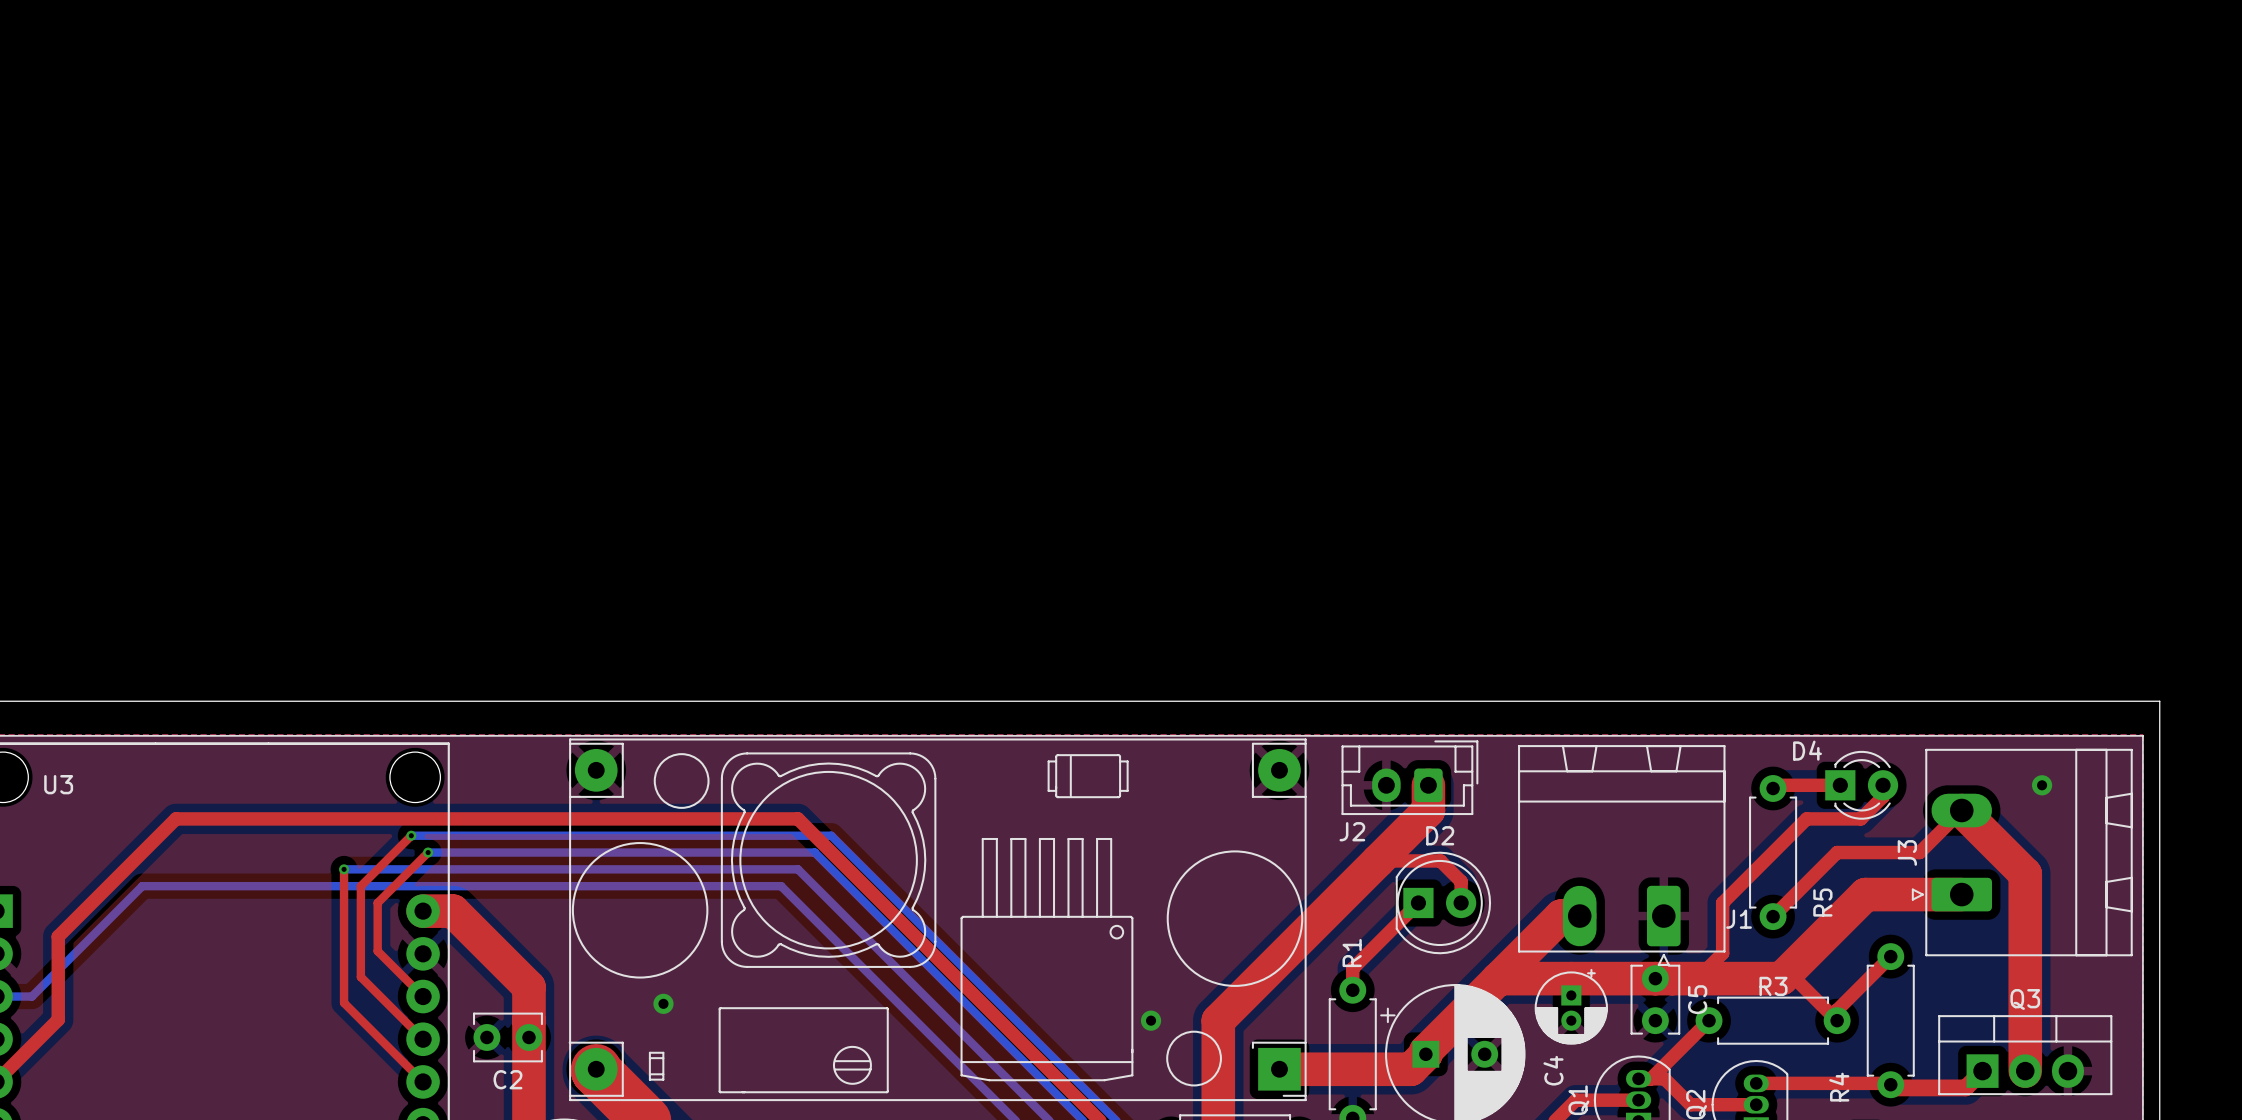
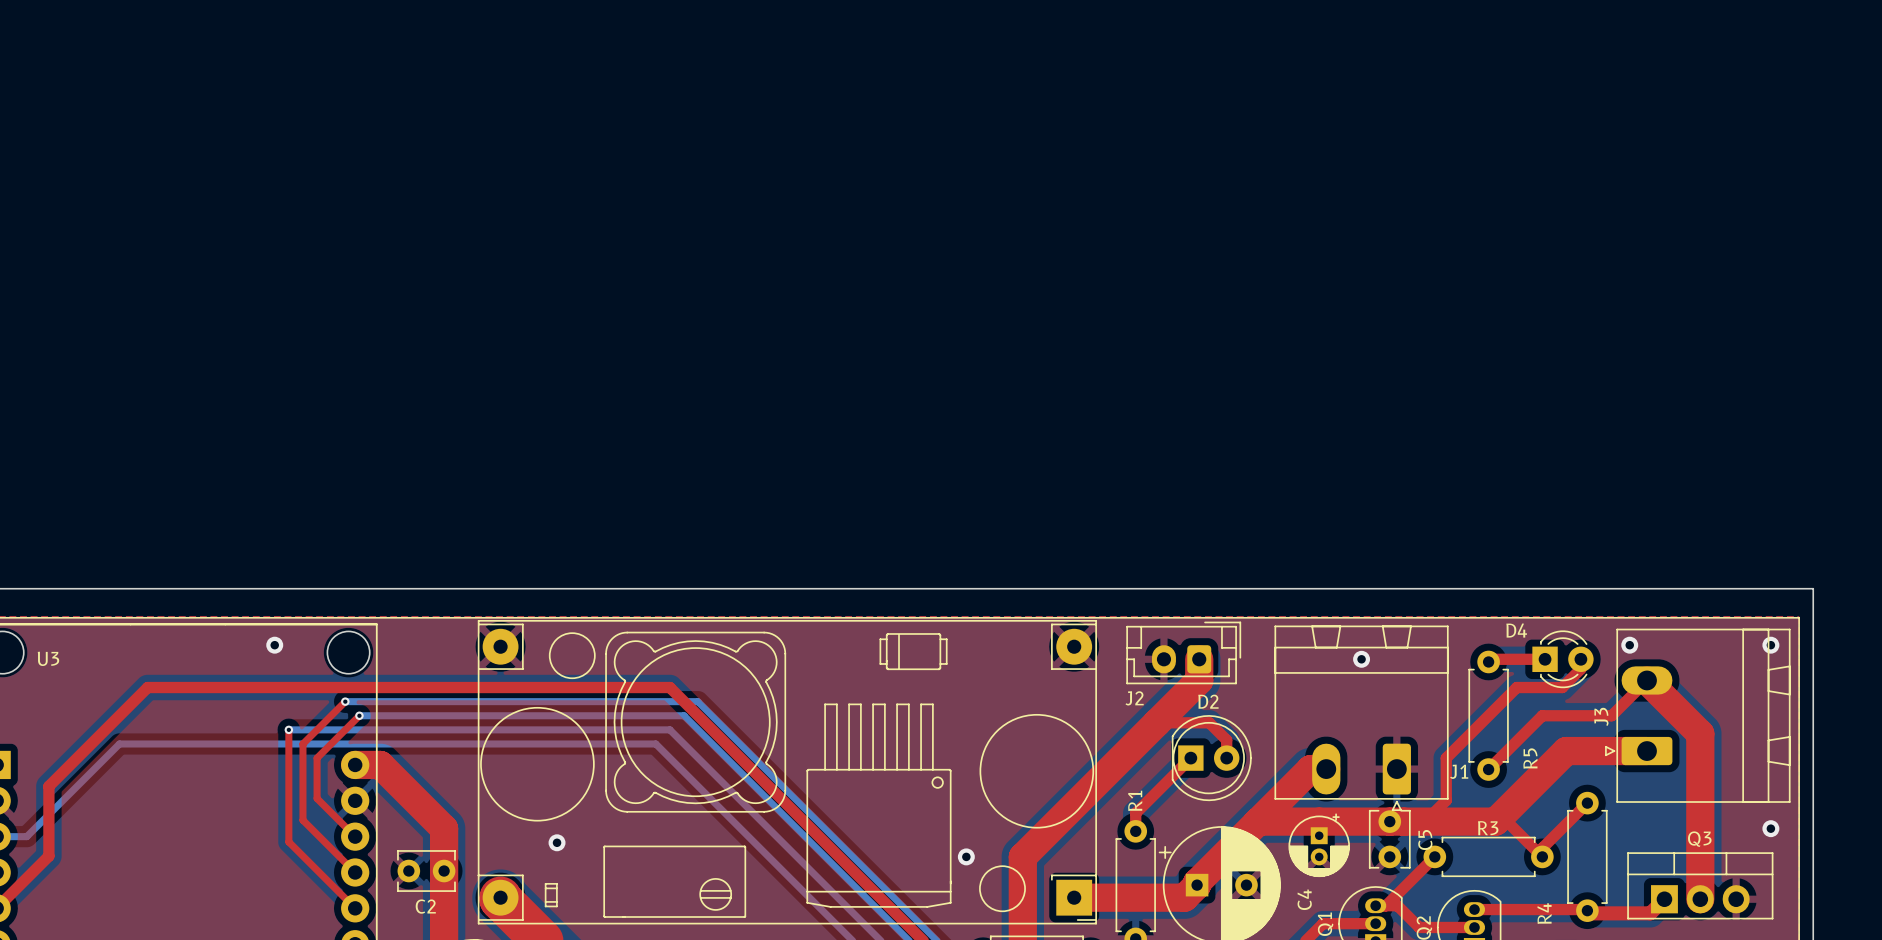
via: none -> (274, 645)
via: none -> (1629, 645)
via: none -> (1770, 645)
via: none -> (1361, 659)
via: (2042, 785) -> none
via: none -> (1770, 828)

